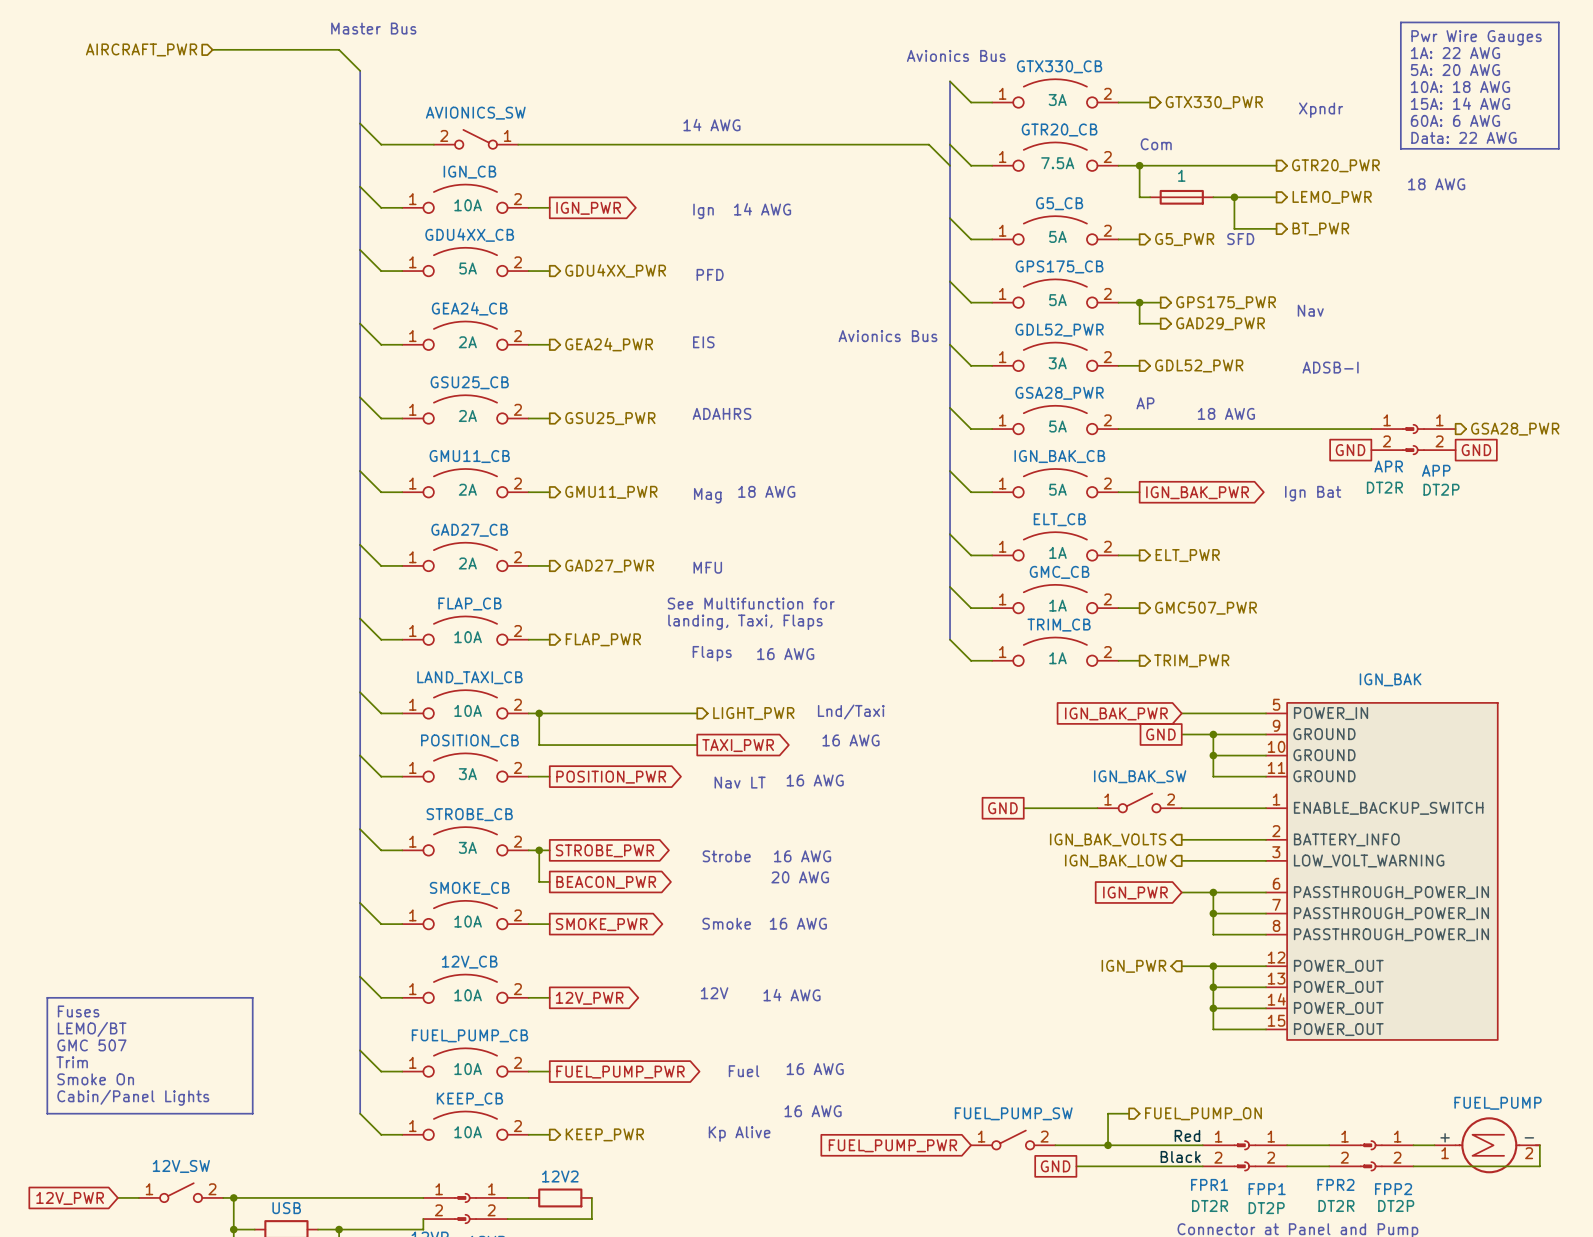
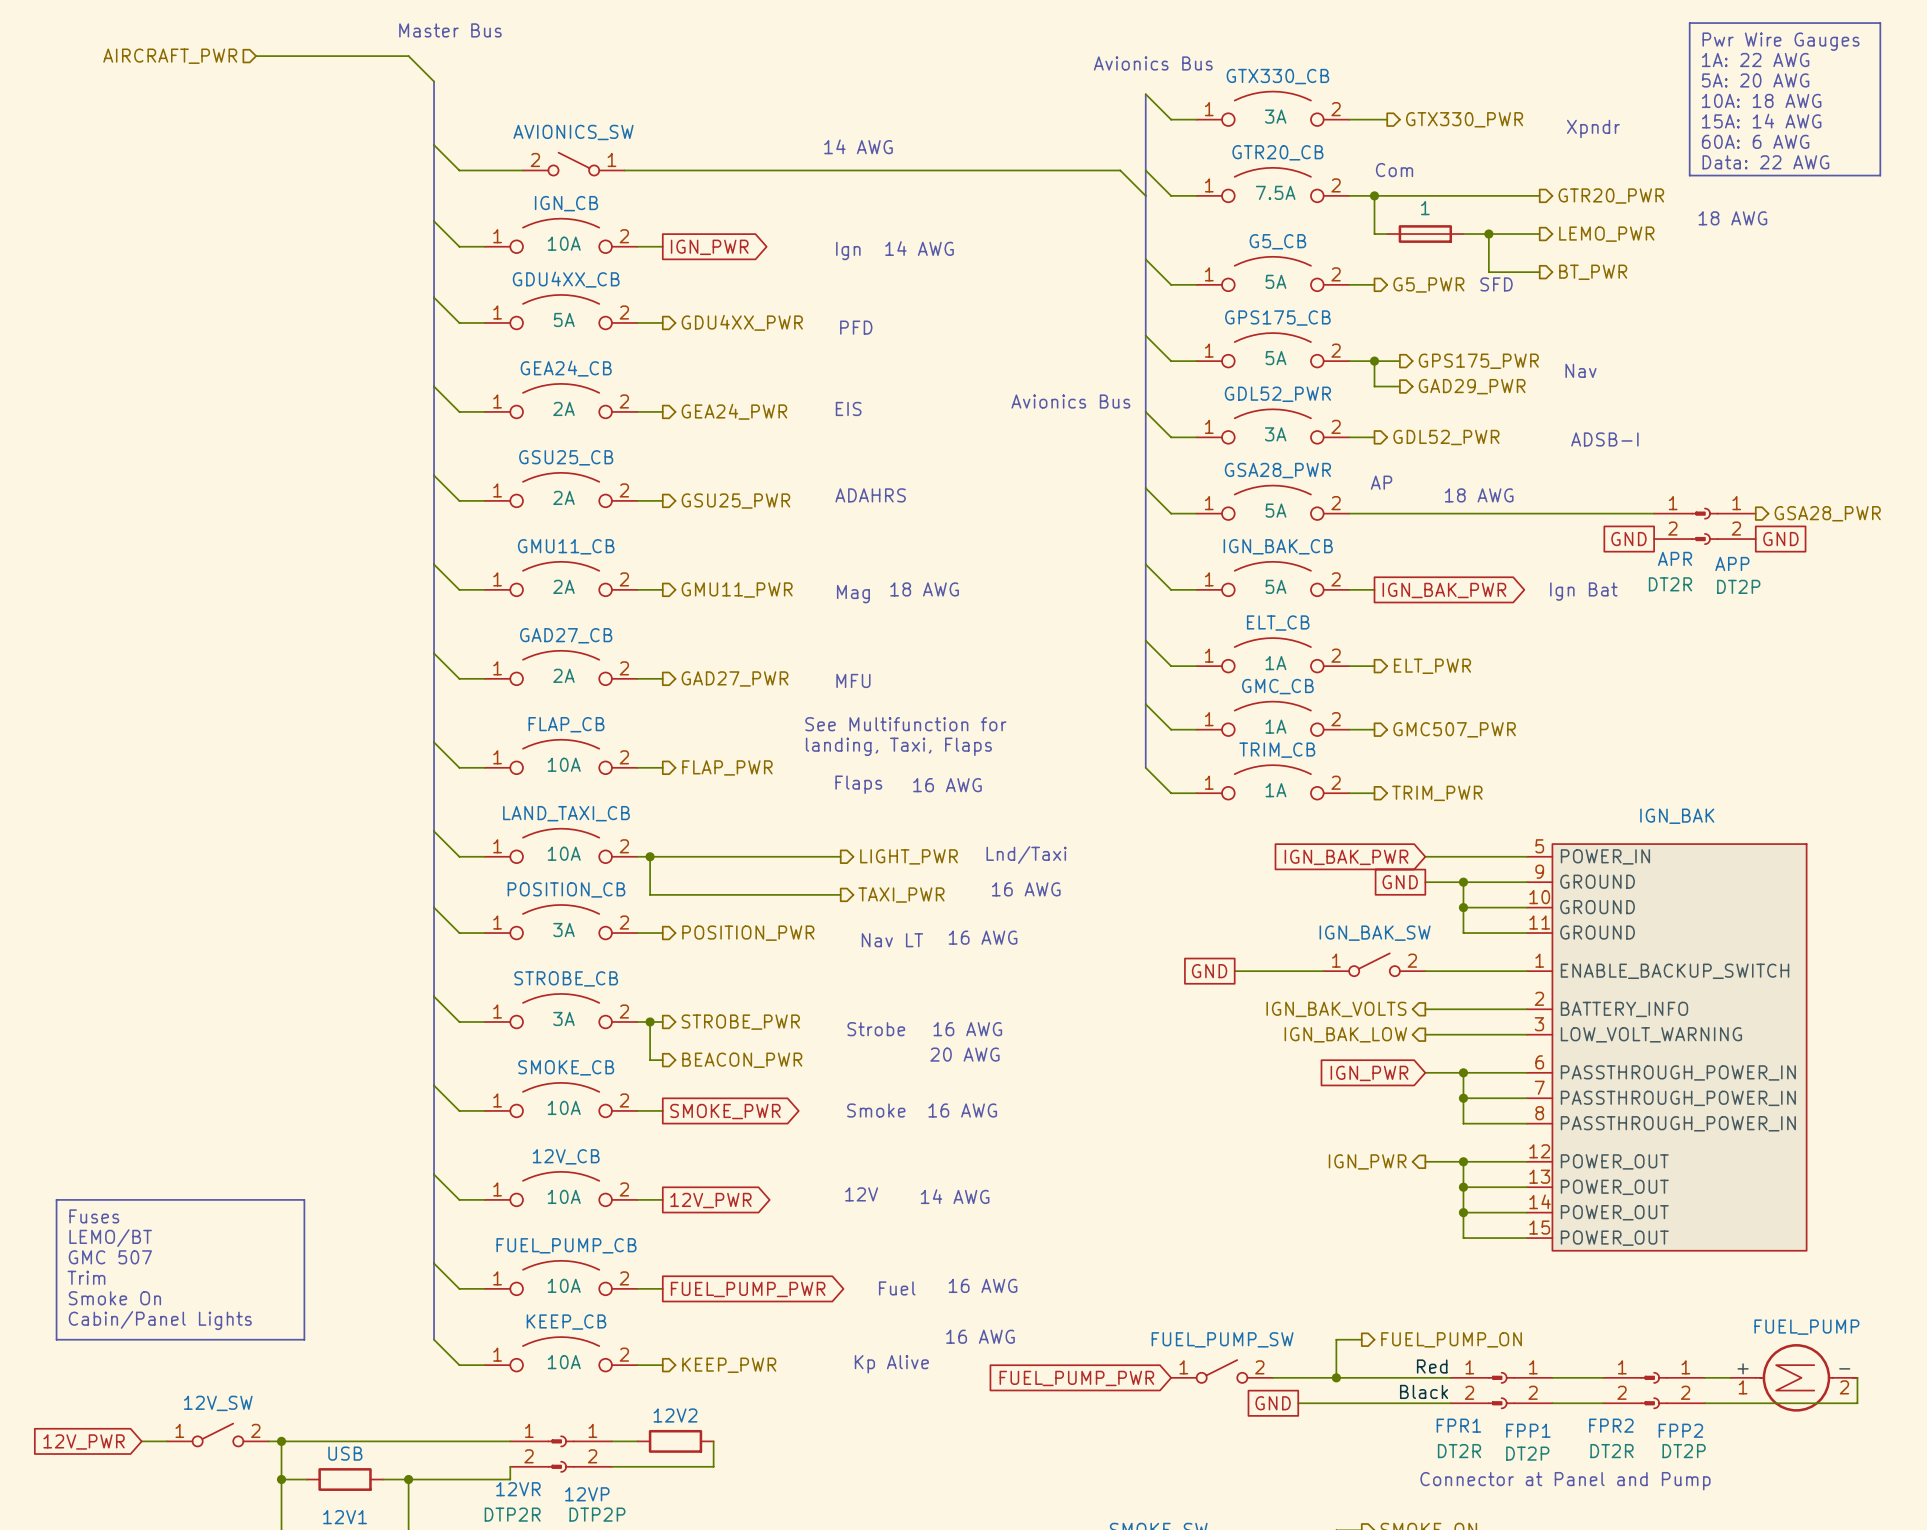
global label: TAXI_PWR (738, 745) -> none
hierarchical label: none -> TAXI_PWR (901, 895)
hierarchical label: none -> POSITION_PWR (748, 933)
global label: POSITION_PWR (611, 777) -> none
global label: STROBE_PWR (604, 850) -> none
hierarchical label: none -> STROBE_PWR (740, 1022)
global label: BEACON_PWR (606, 882) -> none
hierarchical label: none -> BEACON_PWR (742, 1060)

